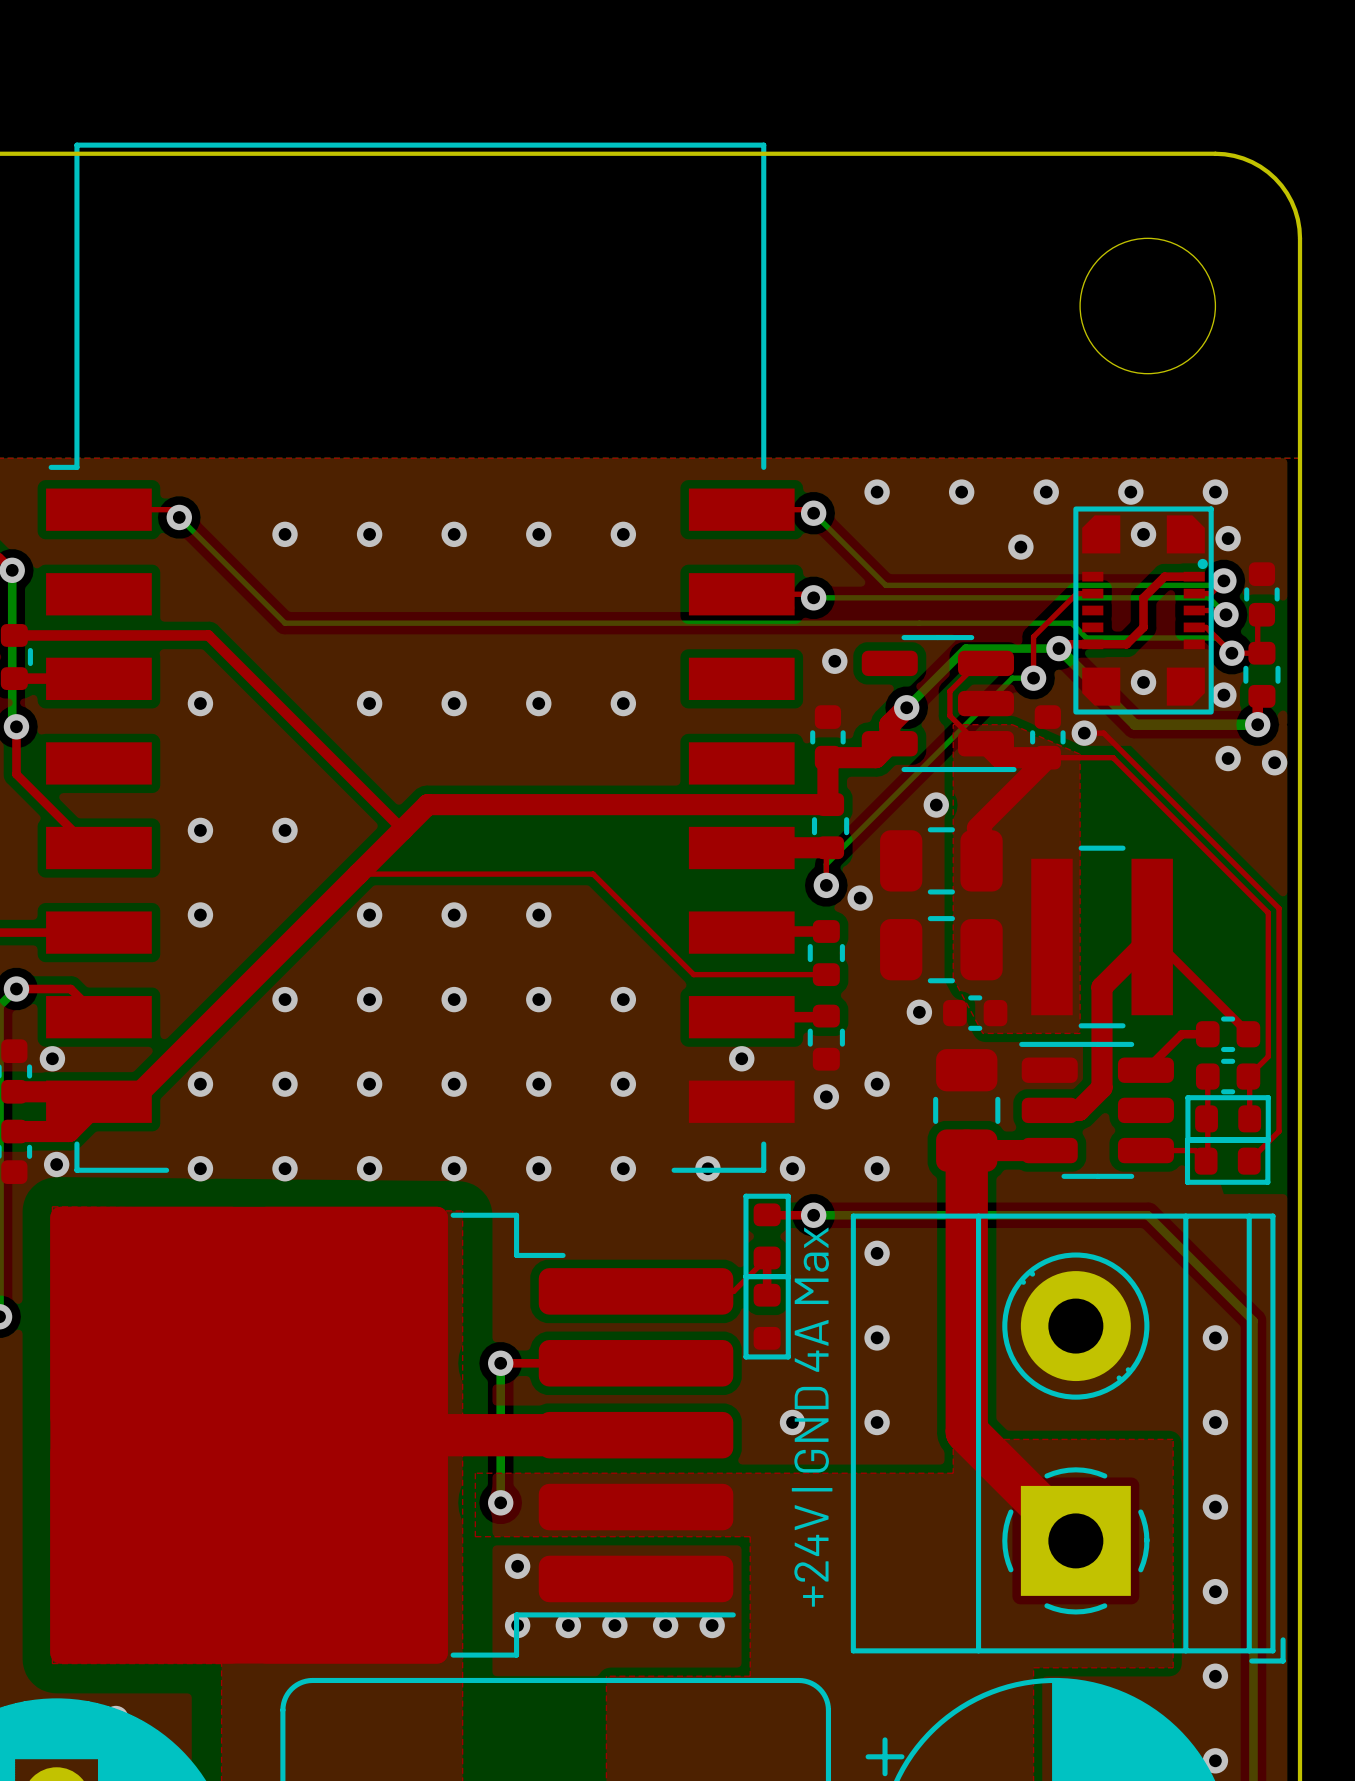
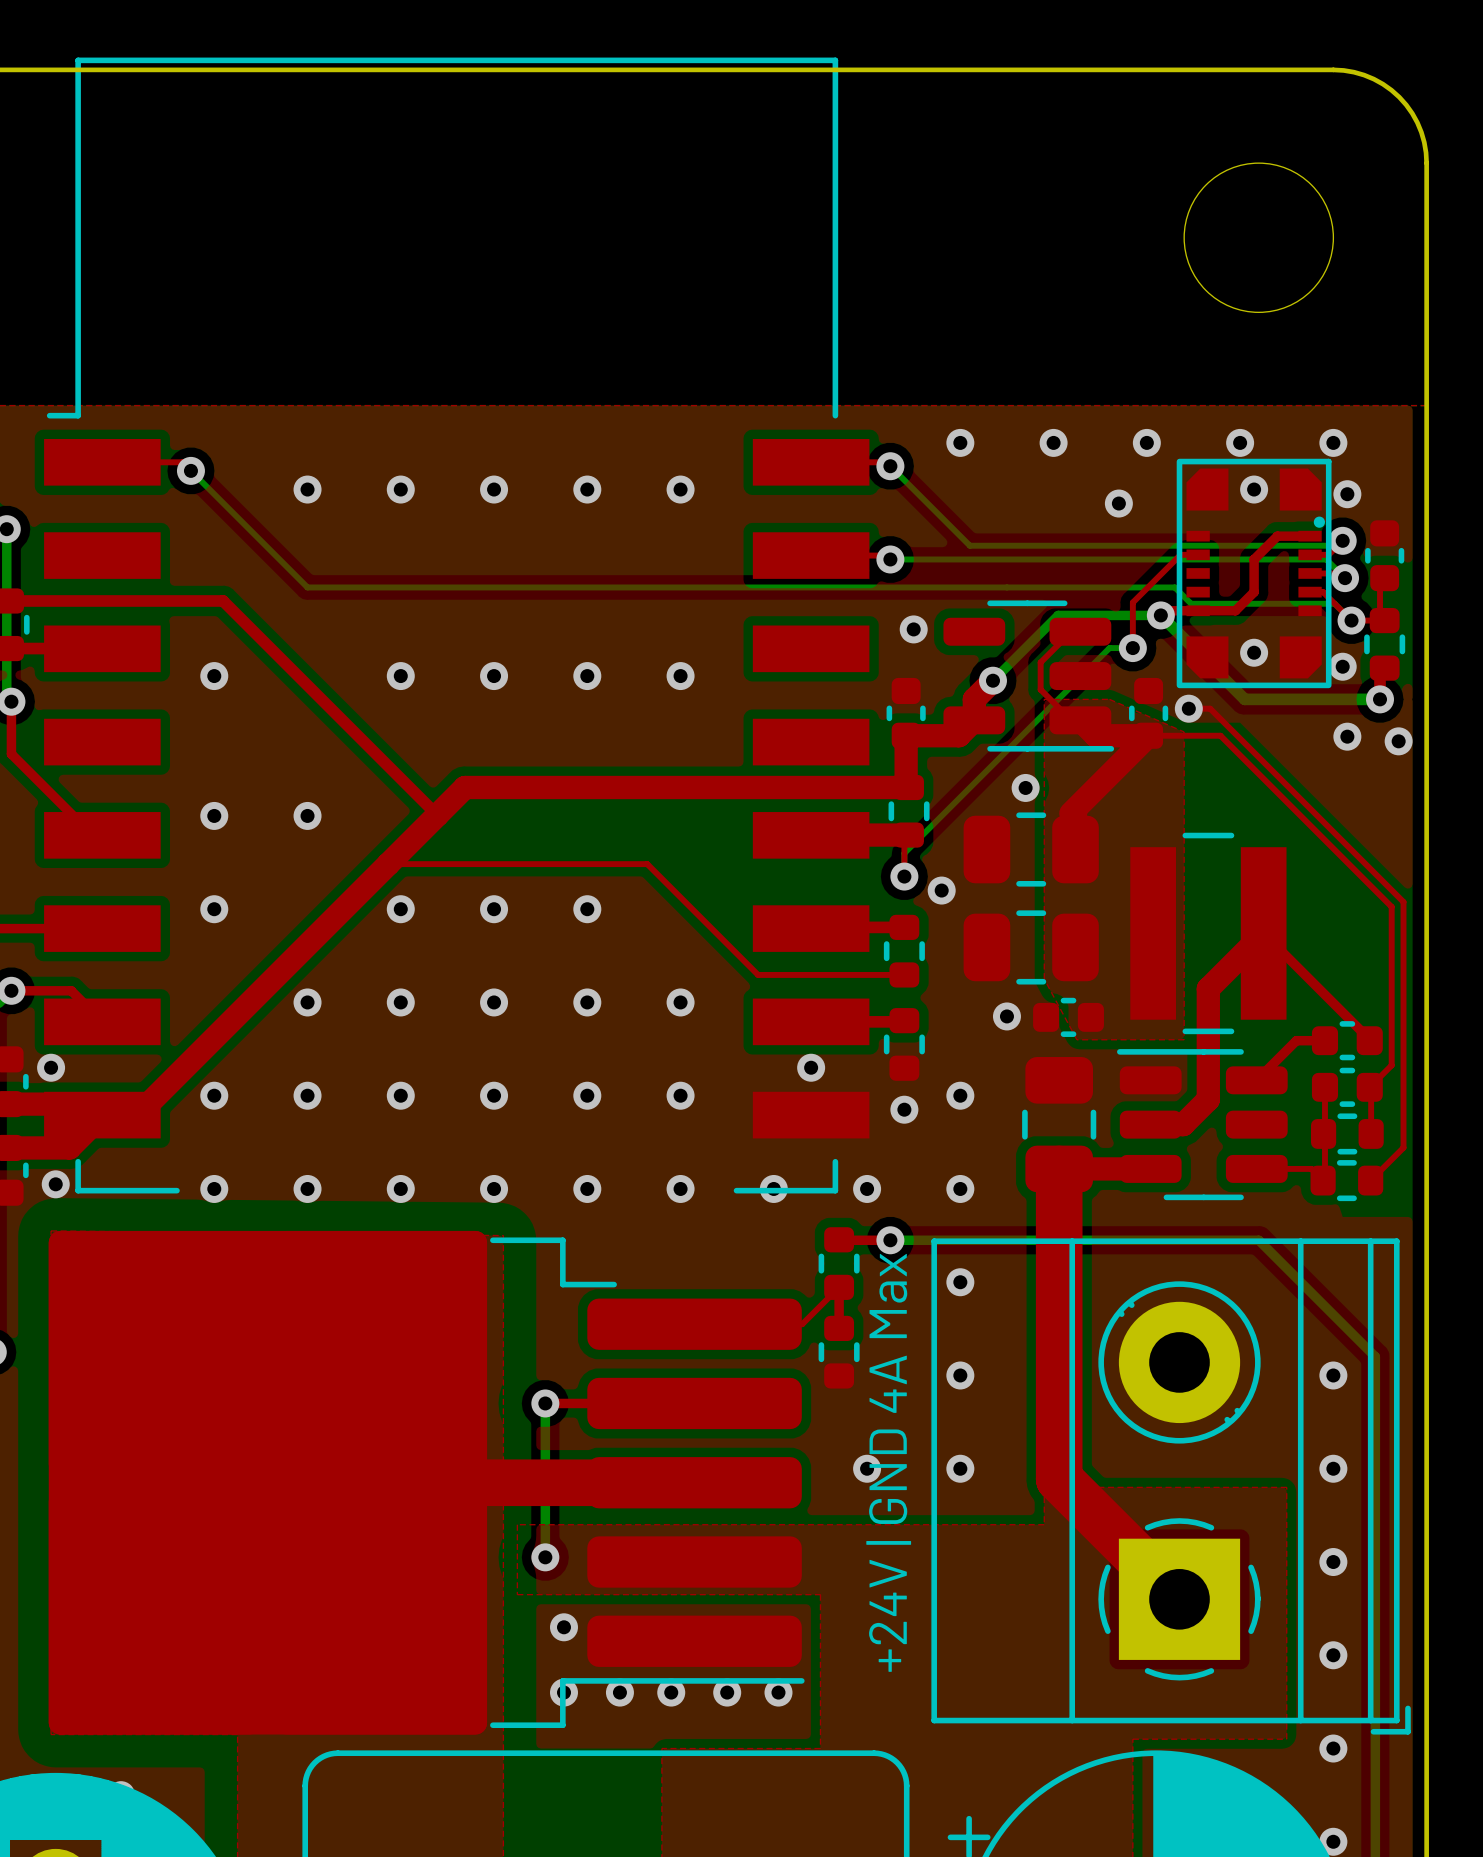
part footprint: [1185, 1095, 1271, 1143] -> [1310, 1113, 1384, 1155]
part footprint: [1184, 1137, 1271, 1185] -> [1310, 1160, 1384, 1202]
part footprint: [743, 1193, 791, 1280] -> [818, 1227, 860, 1300]
part footprint: [743, 1274, 791, 1360] -> [818, 1315, 860, 1389]

